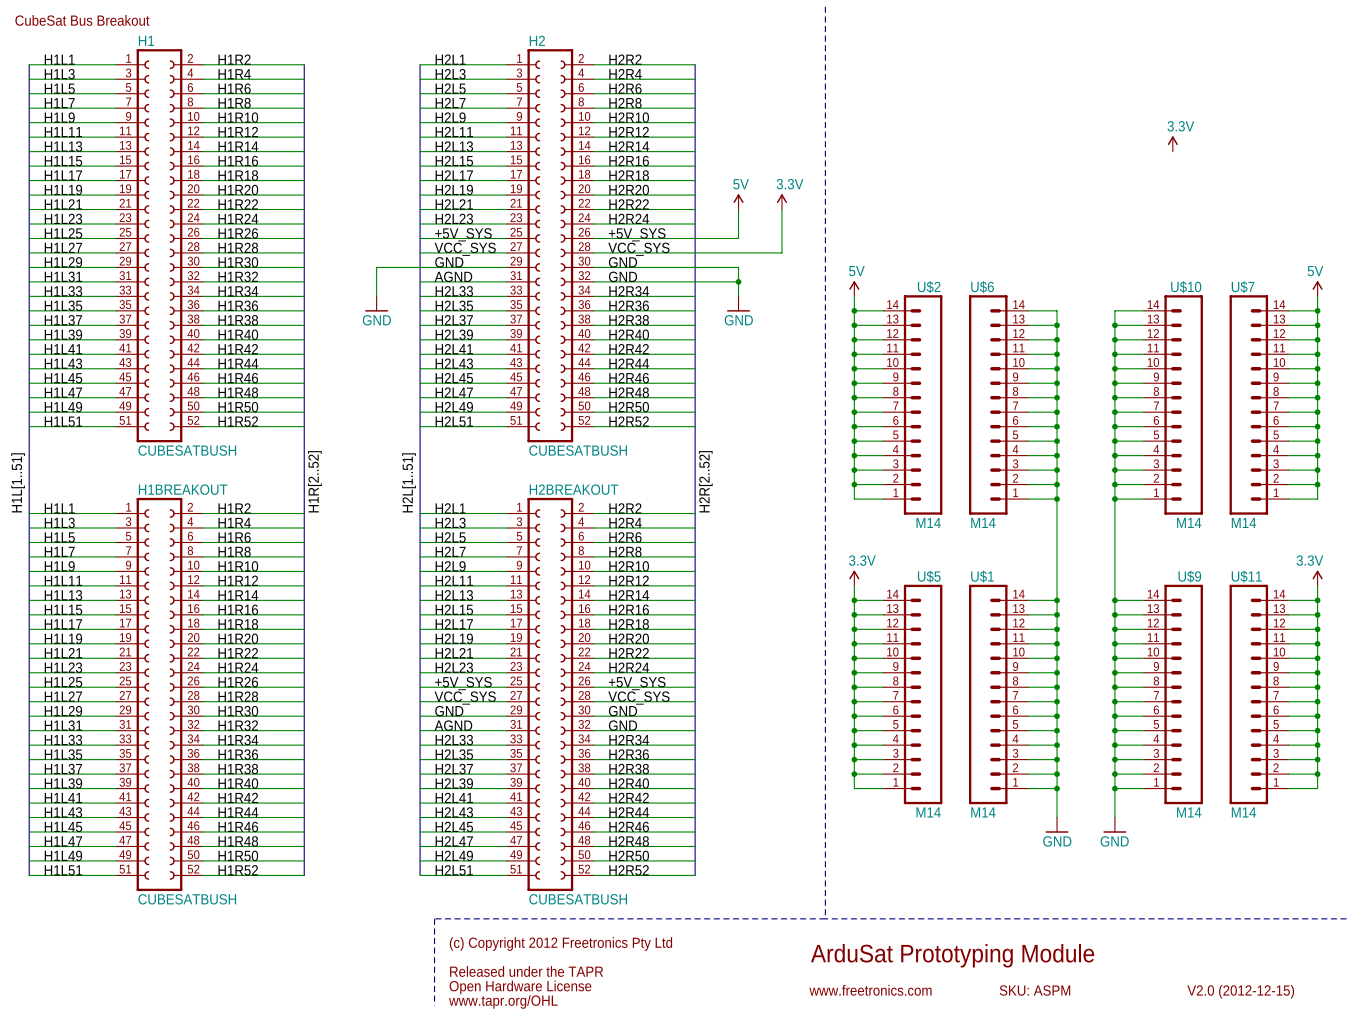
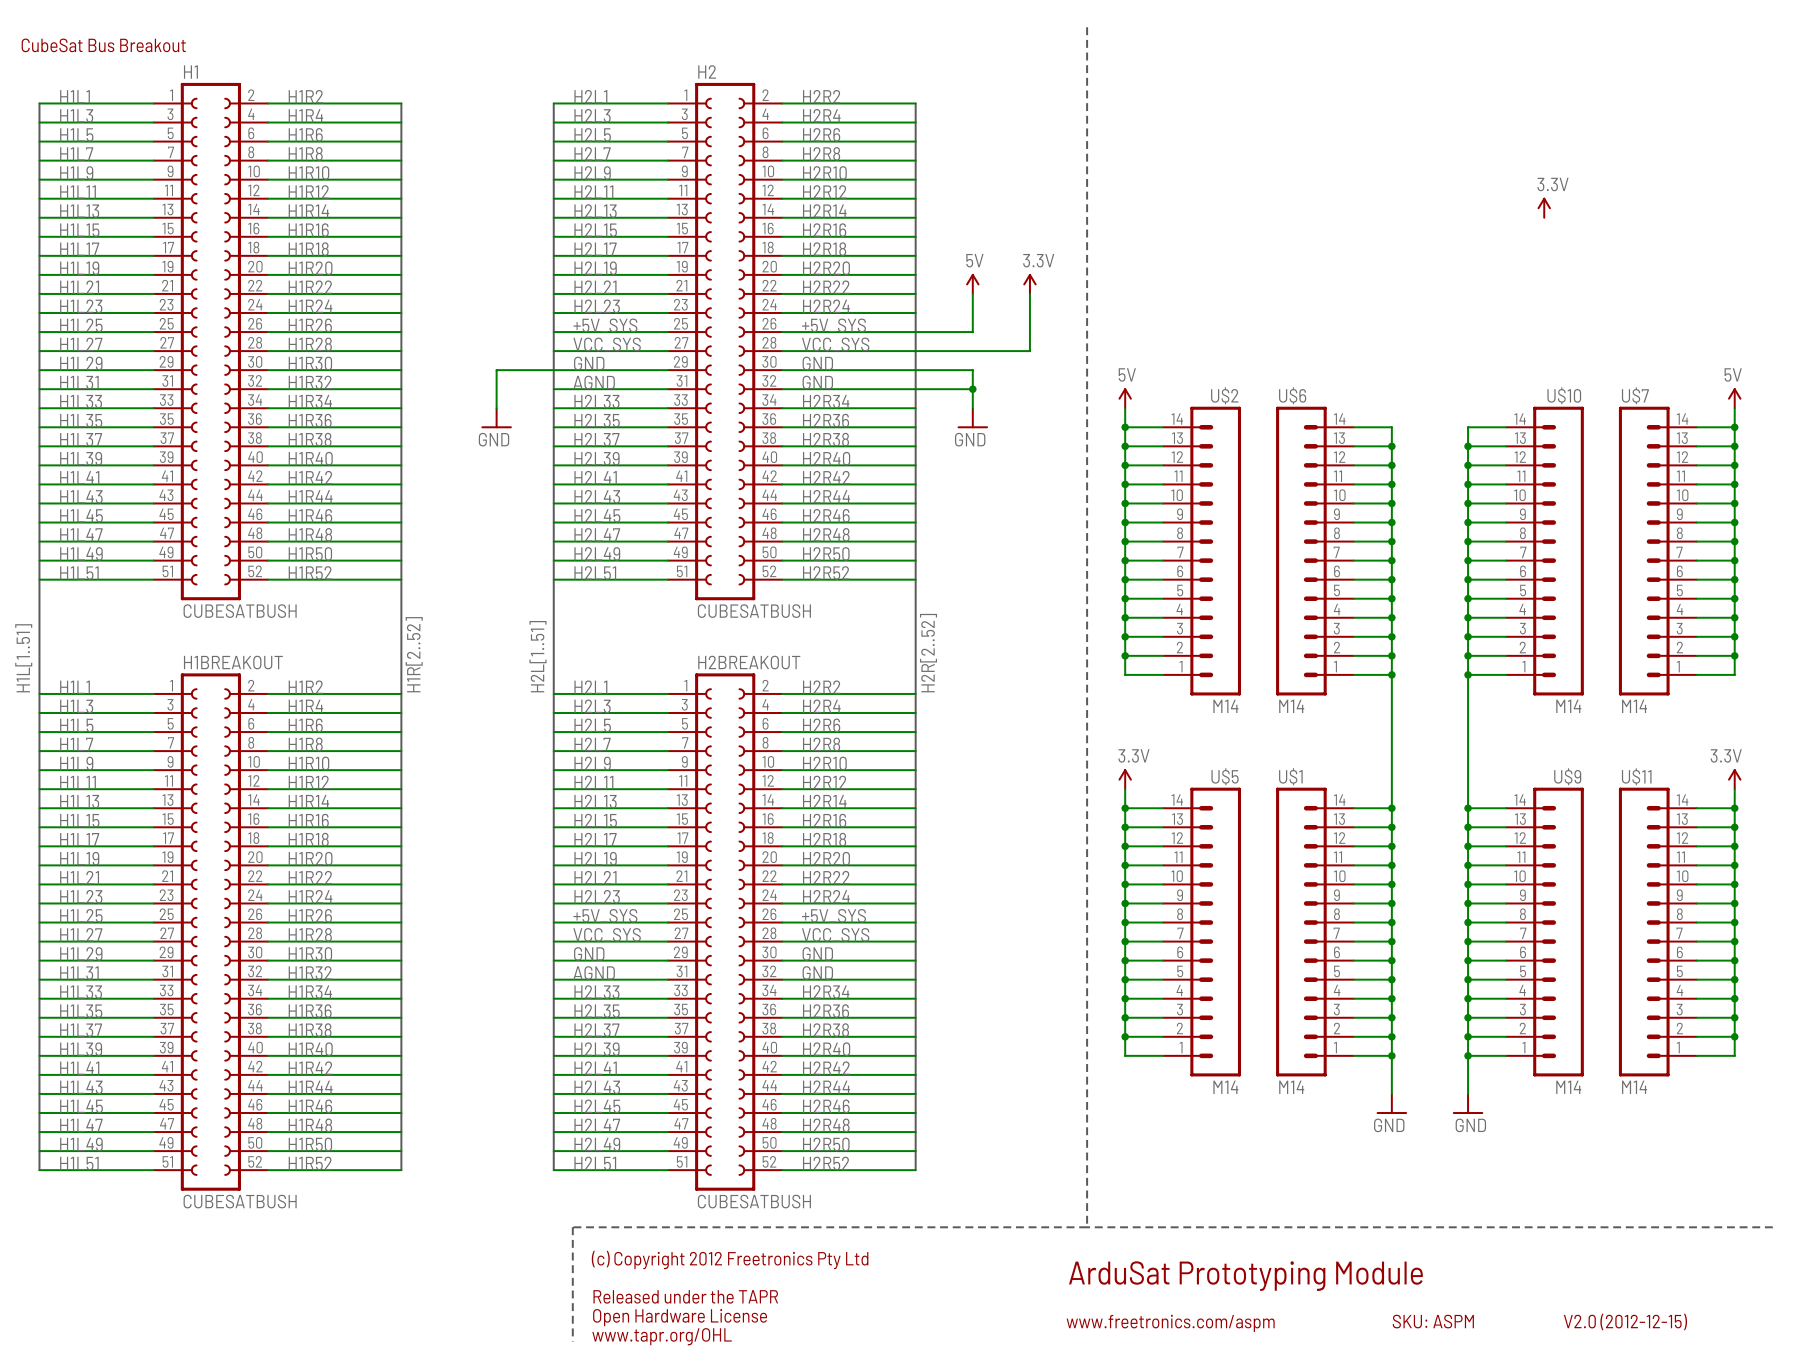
text: www.freetronics.com (870, 990) -> www.freetronics.com/aspm (1170, 1323)
text position: SKU: ASPM (1034, 990) -> SKU: ASPM (1433, 1321)

